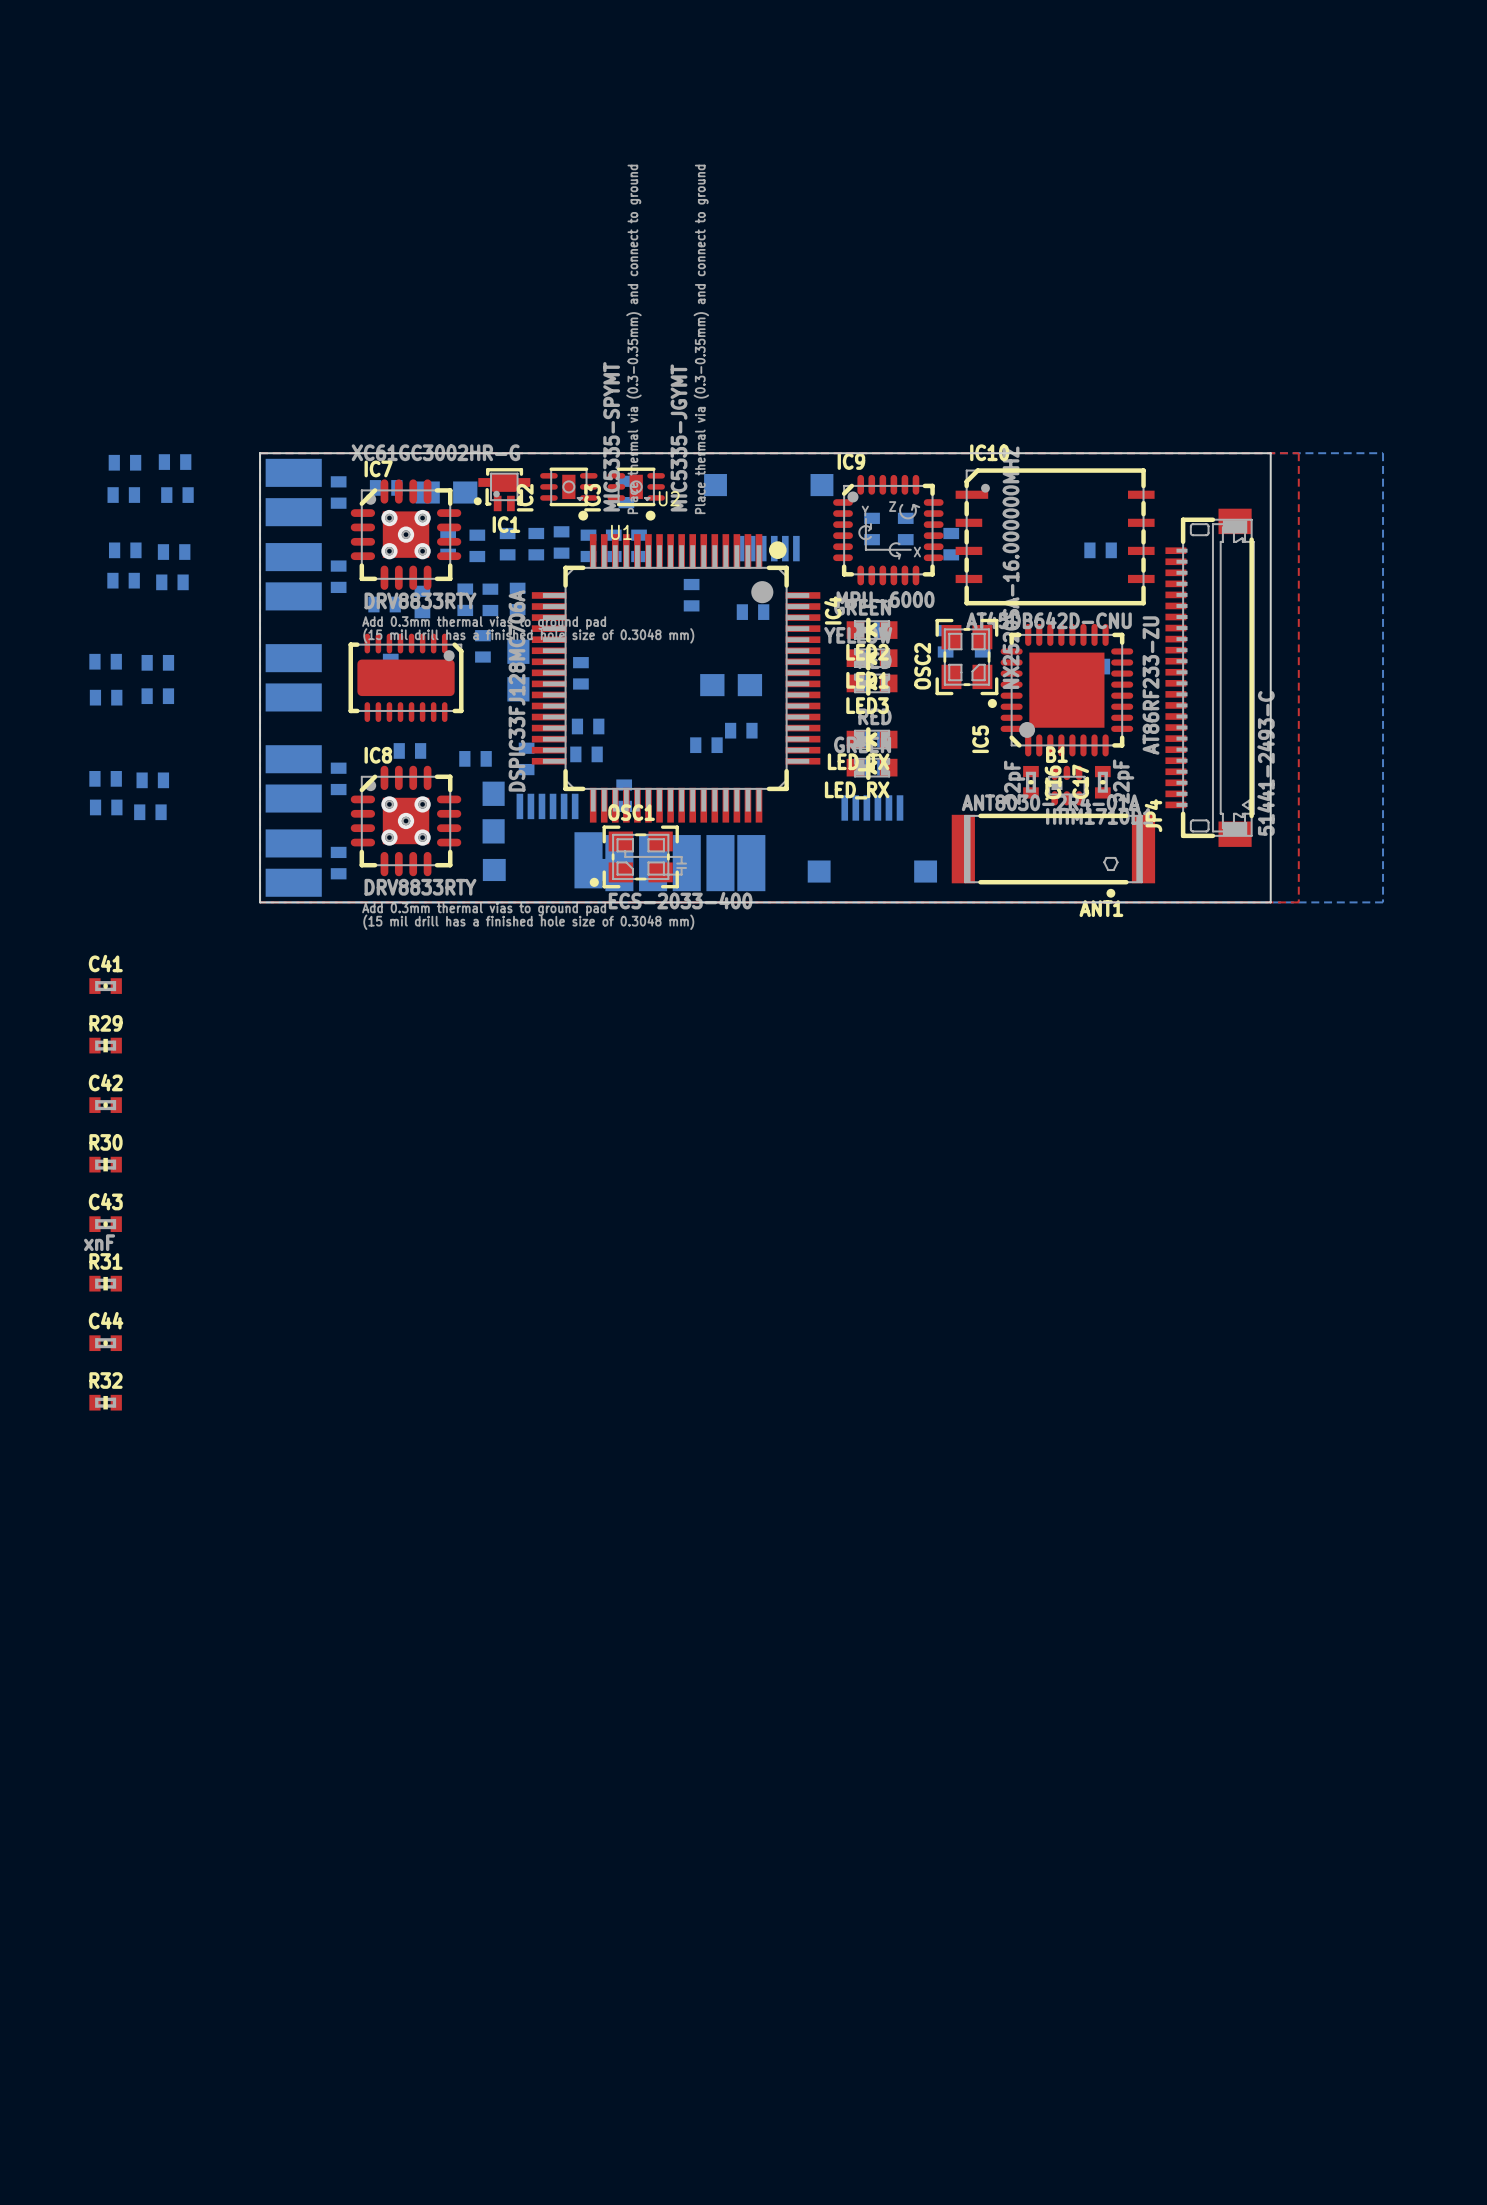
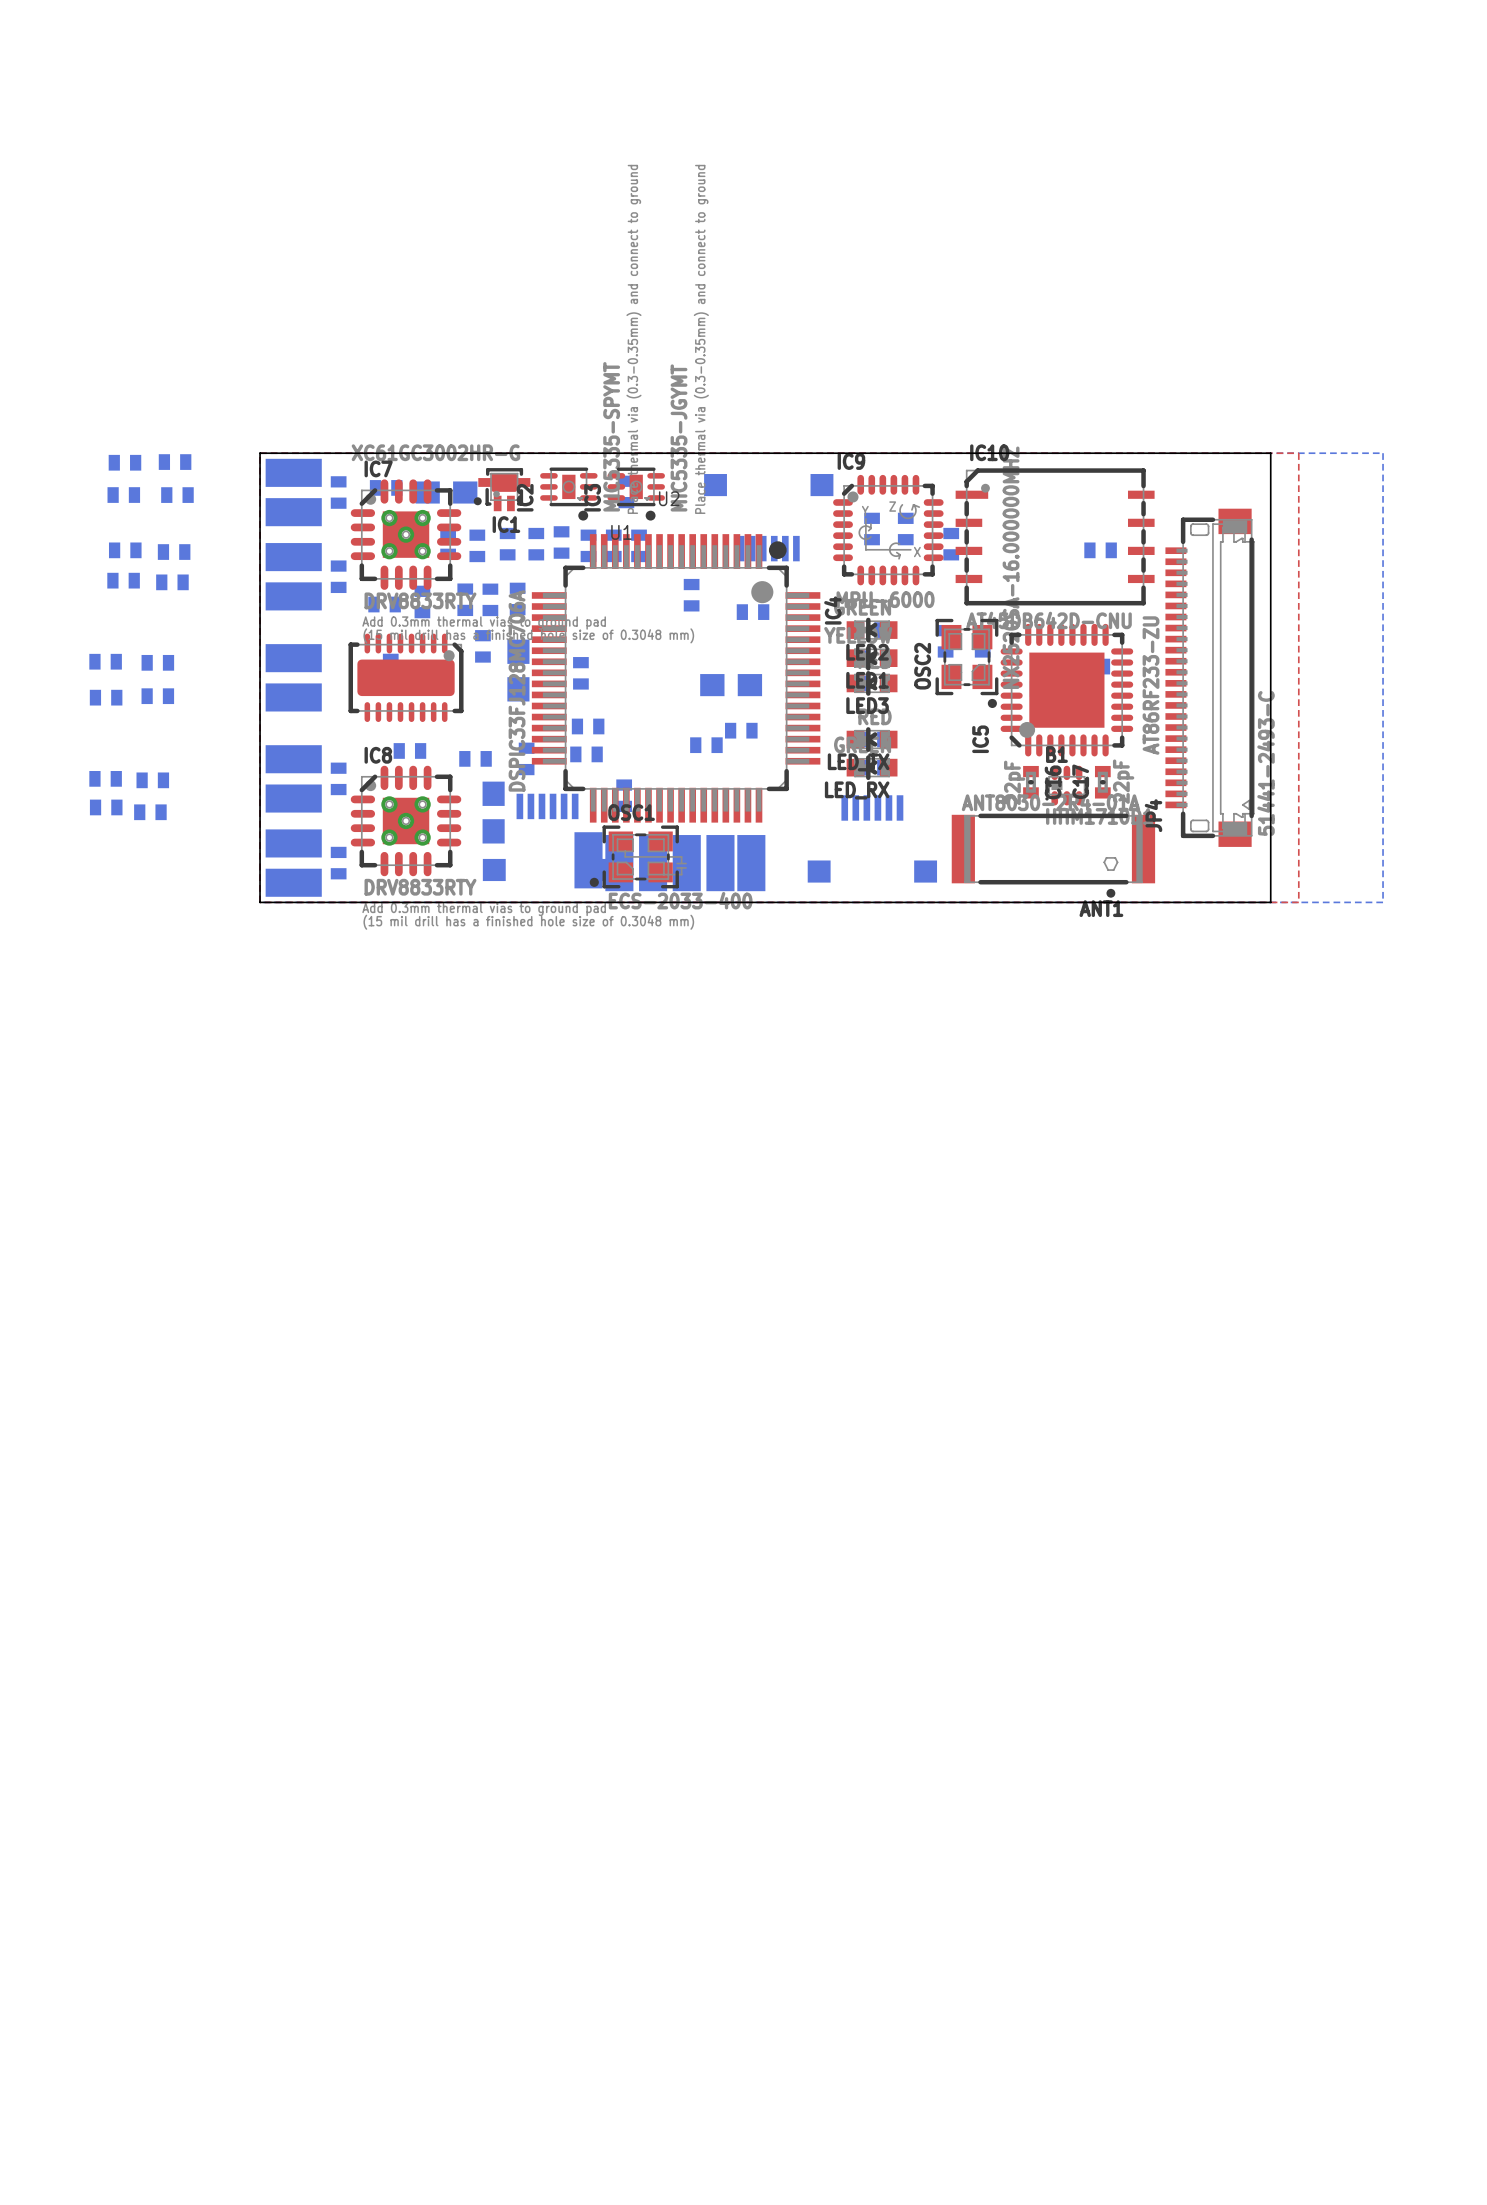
C41: (105, 986) -> none
R29: (105, 1045) -> none
C42: (105, 1105) -> none
R30: (105, 1164) -> none
C43: xnF (105, 1224) -> none
R31: (105, 1283) -> none
C44: (105, 1343) -> none
R32: (105, 1402) -> none

